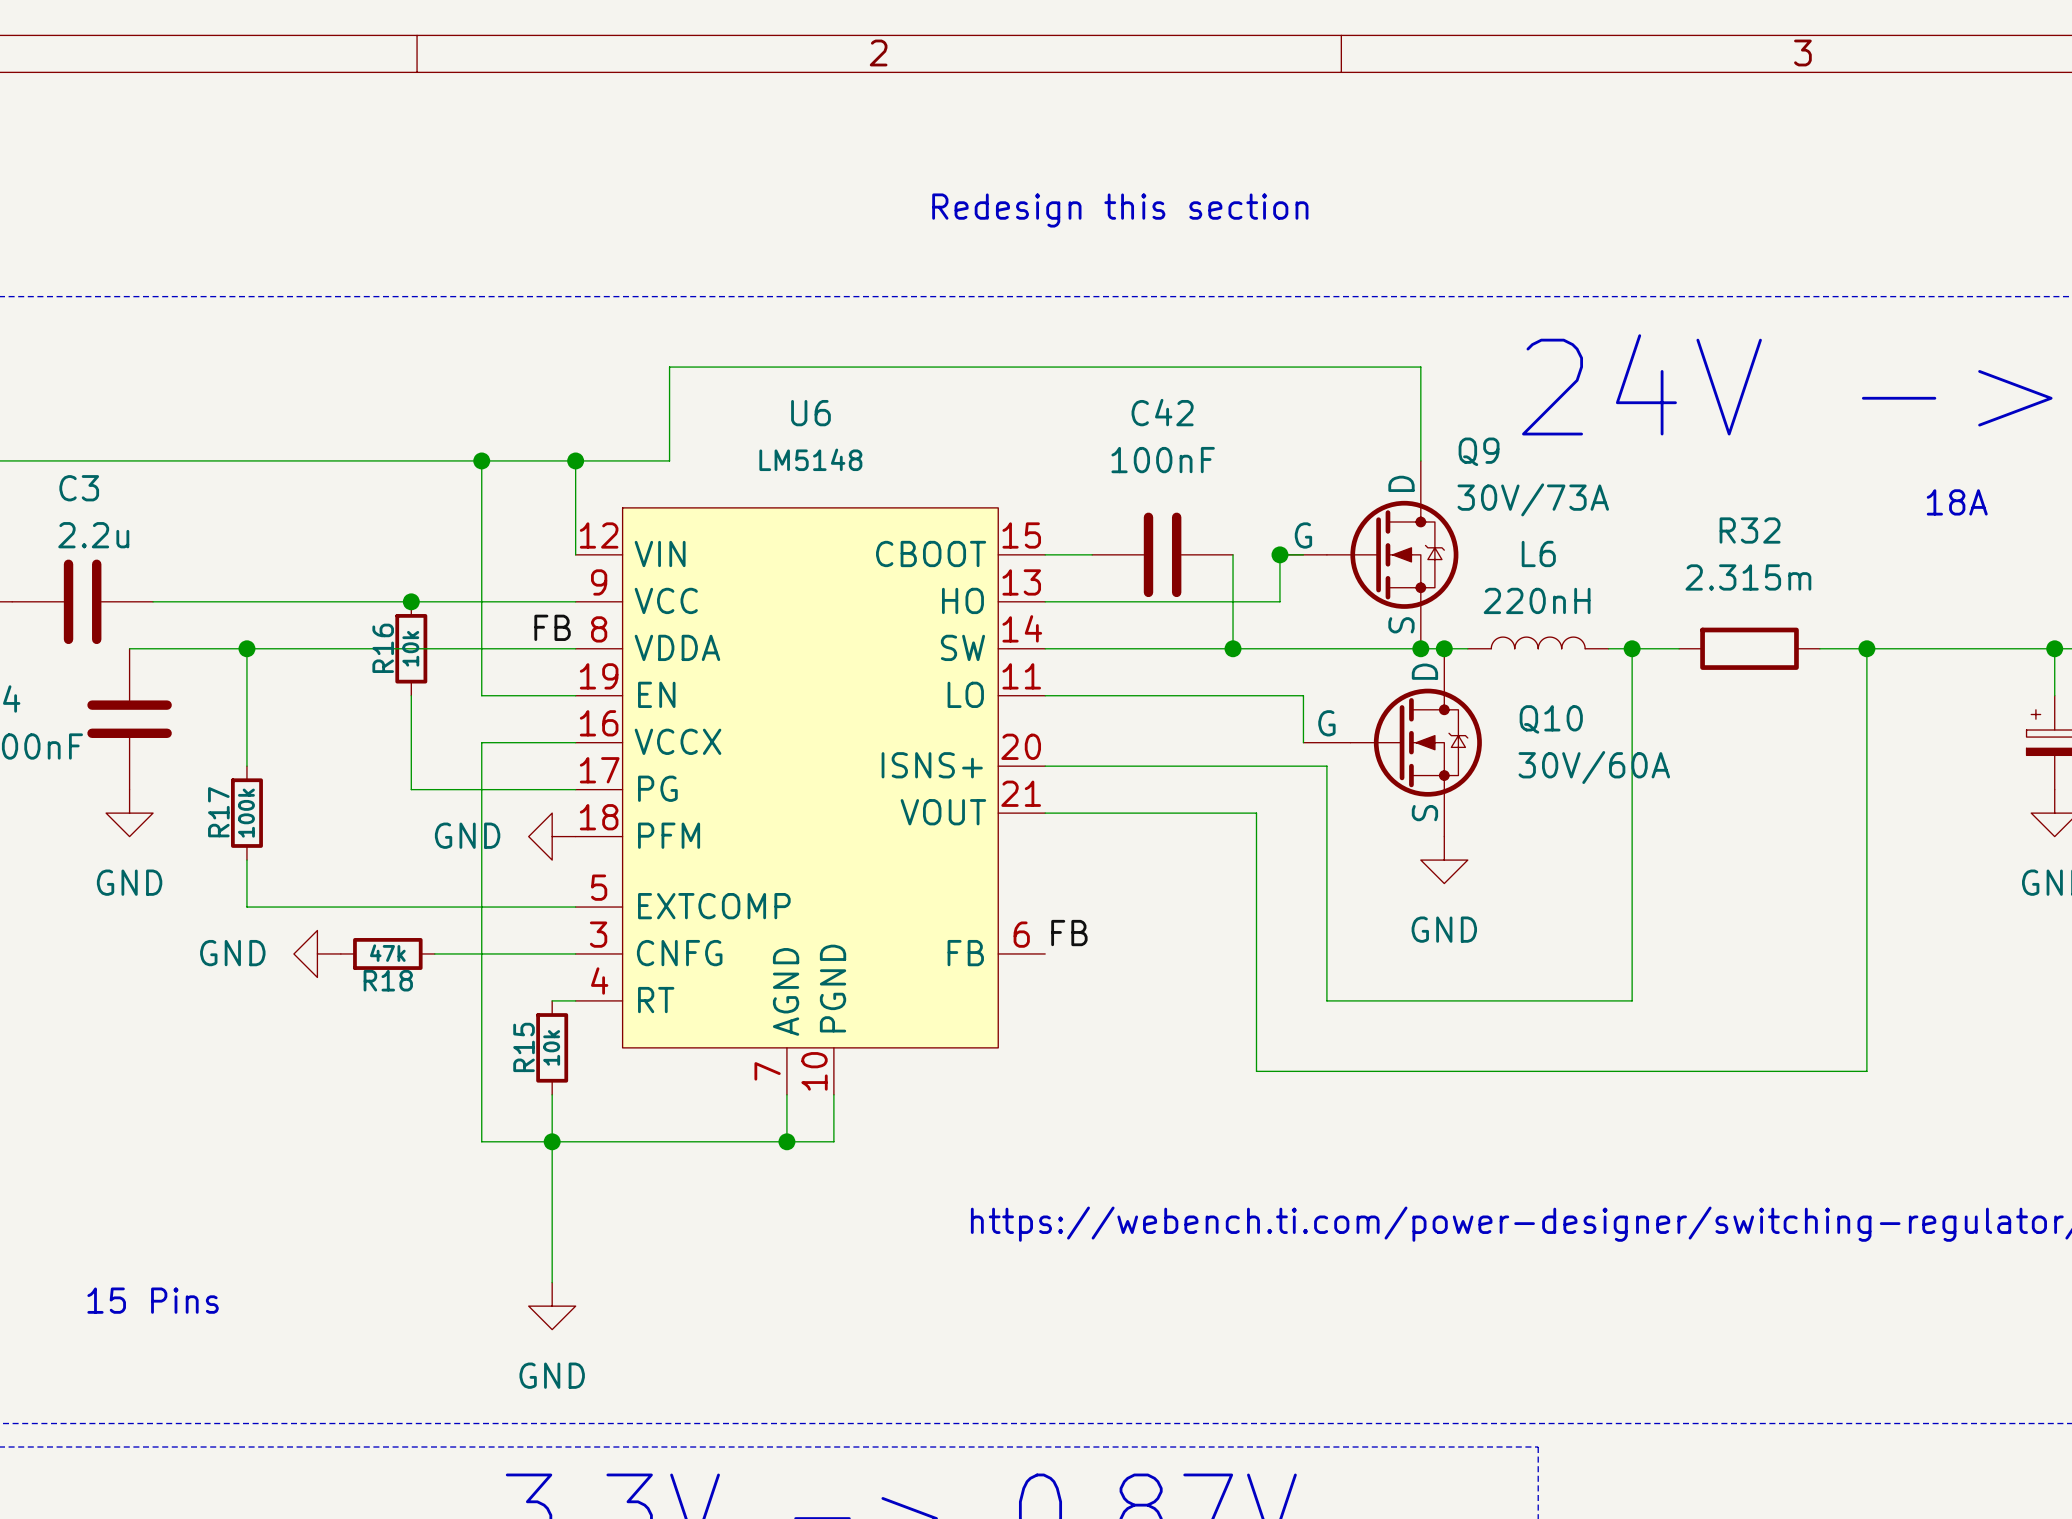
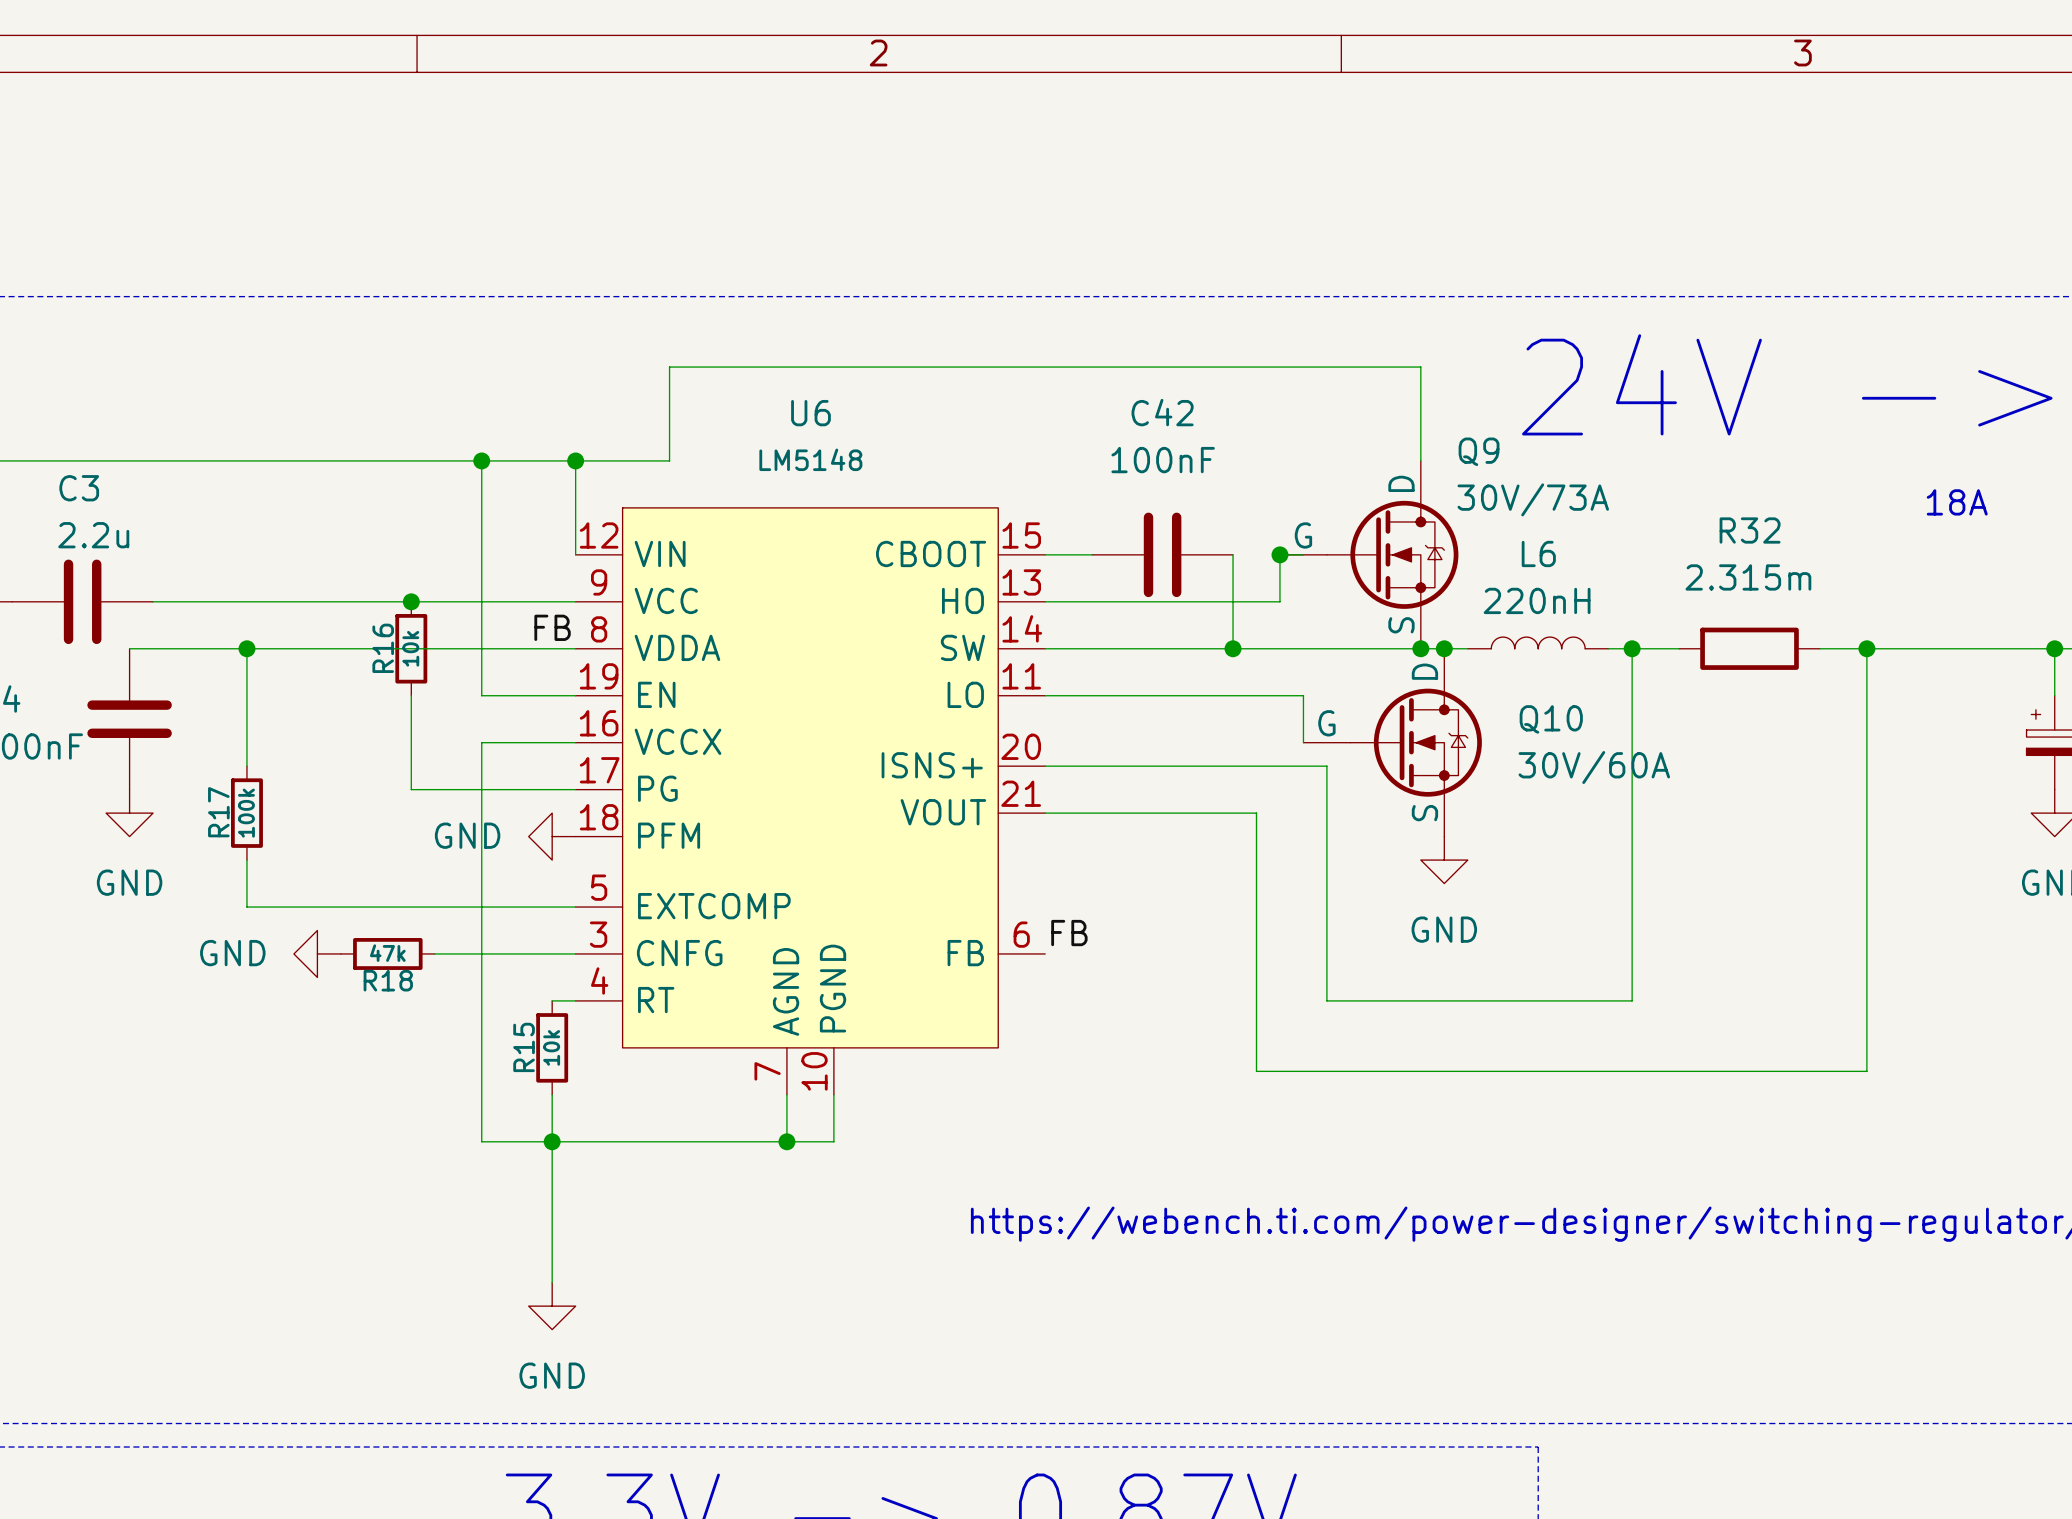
text: Redesign this section (1120, 210) -> none
text: 15 Pins (153, 1300) -> none

